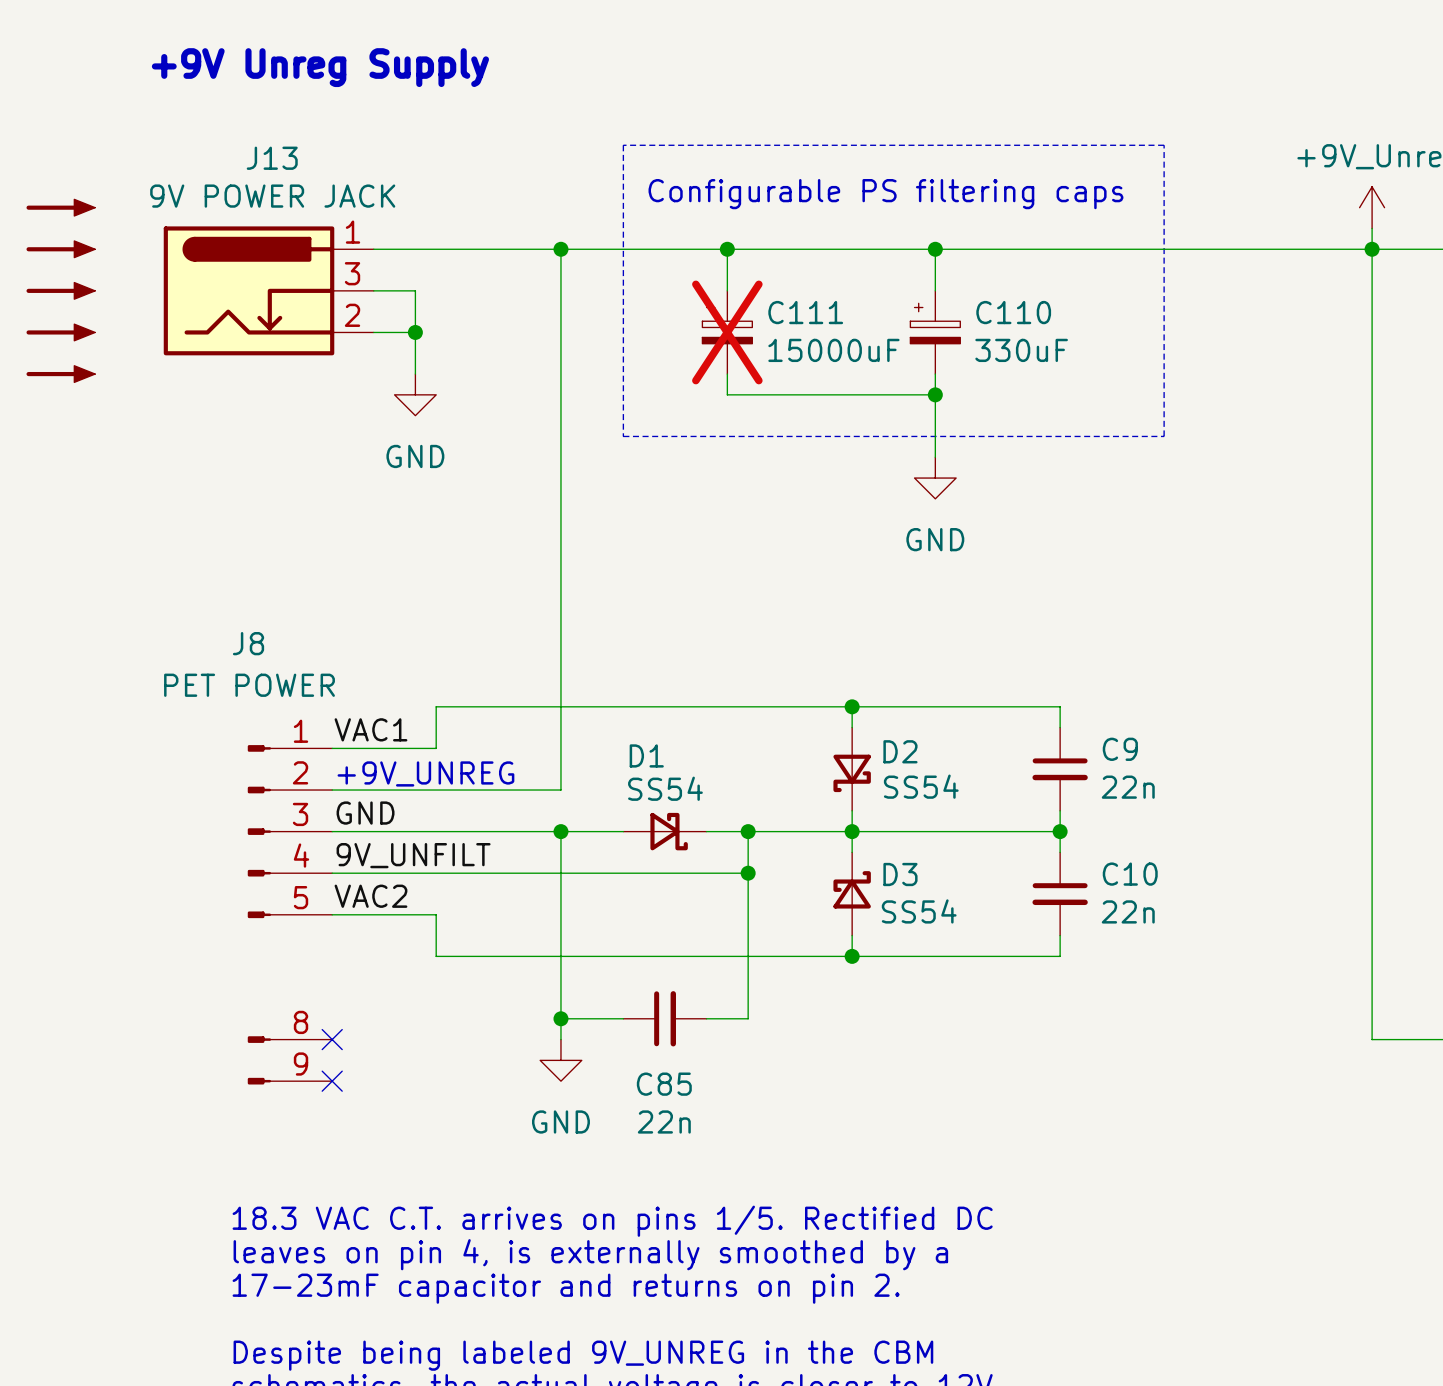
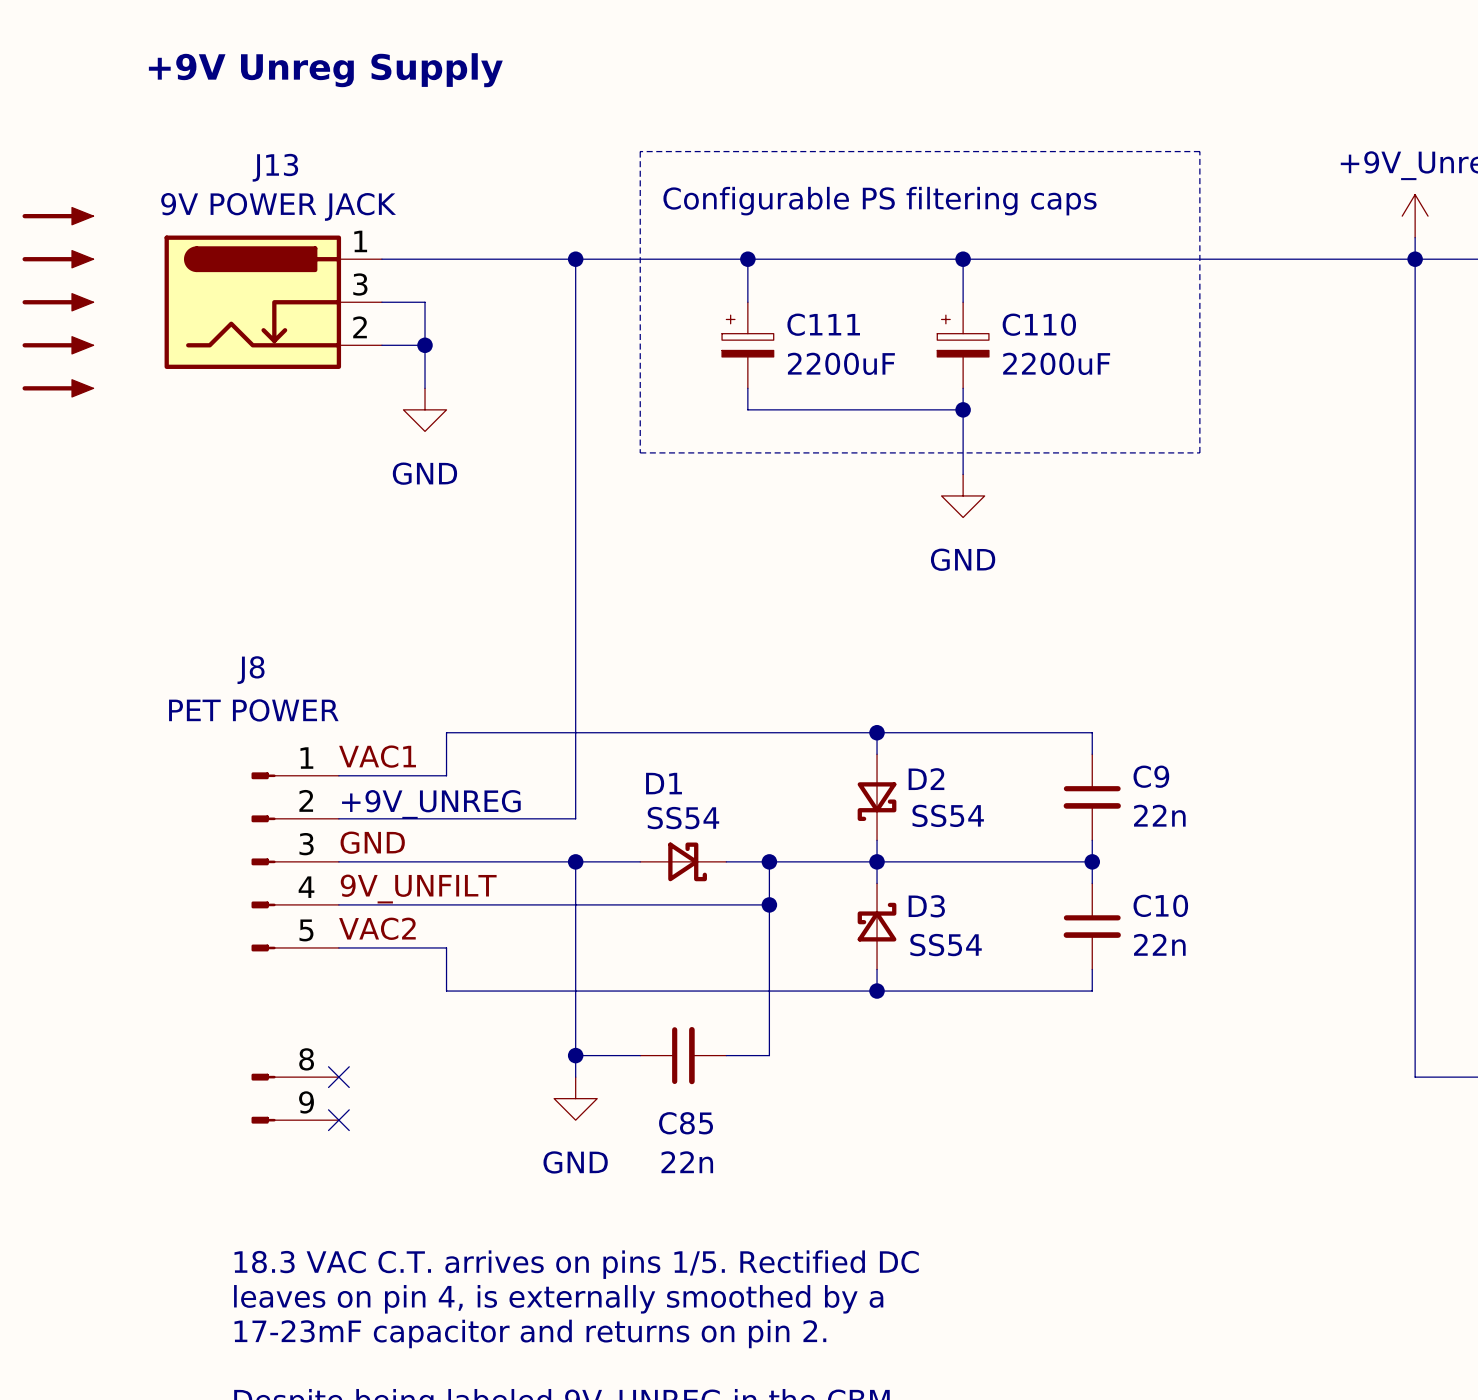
C111 do-not-place cross: (727, 332) -> none
C111 value: 15000uF (833, 350) -> 2200uF (841, 363)
C110 value: 330uF (1021, 350) -> 2200uF (1056, 363)

